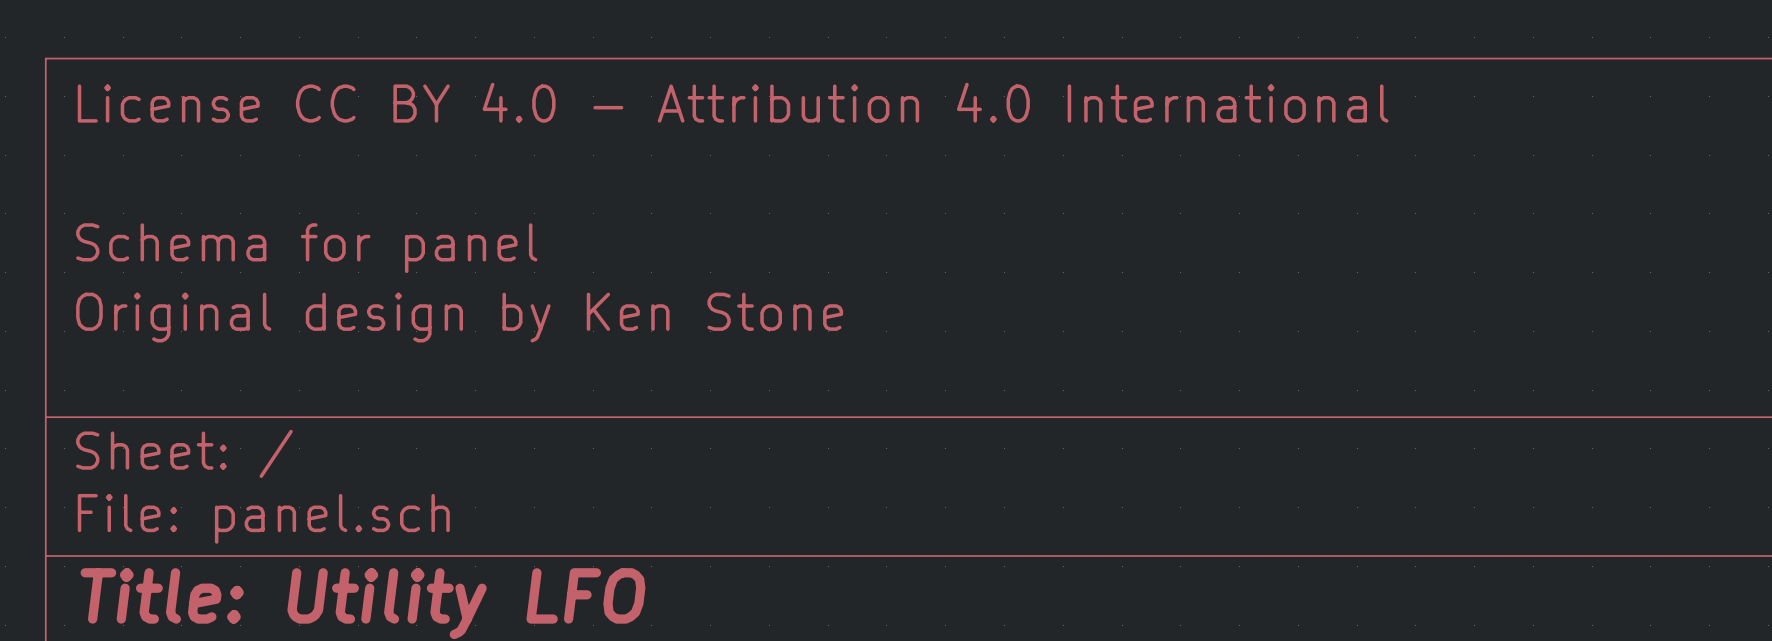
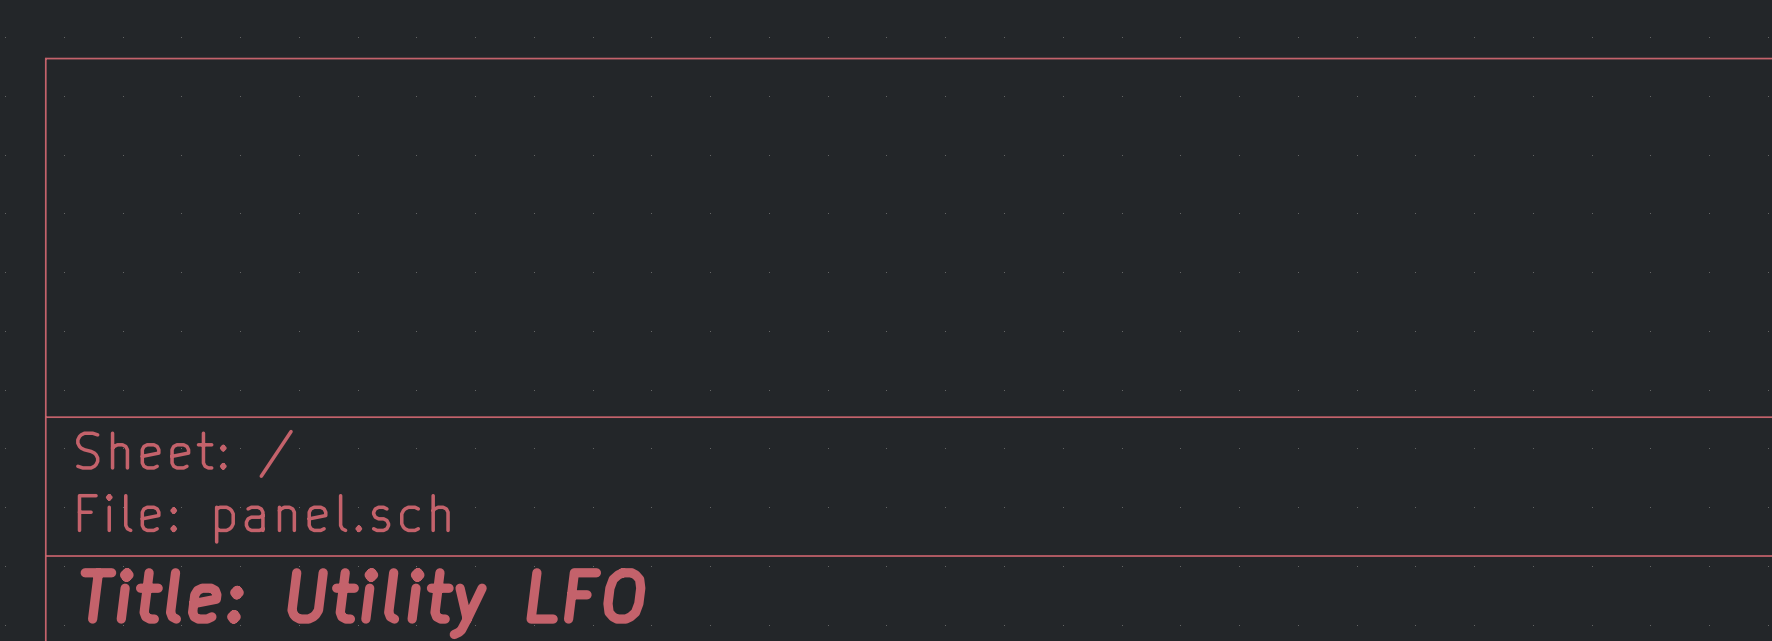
title block: License CC BY 4.0 - Attribution 4.0 International (733, 102) -> none
title block: Schema for panel (306, 248) -> none
title block: Original design by Ken Stone (459, 317) -> none

